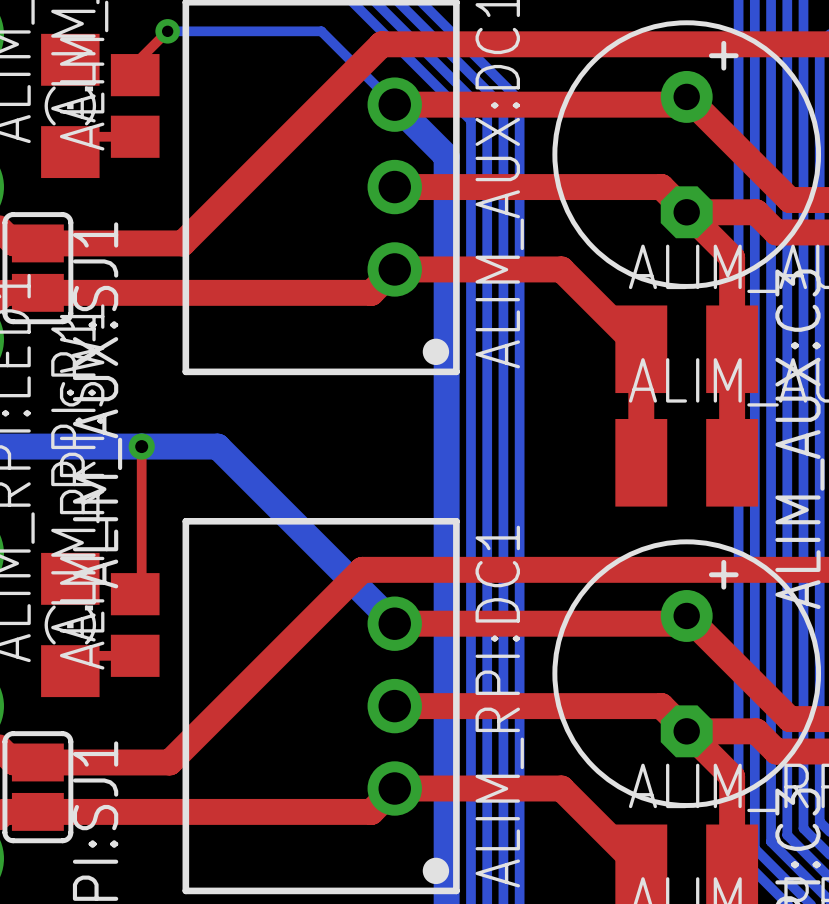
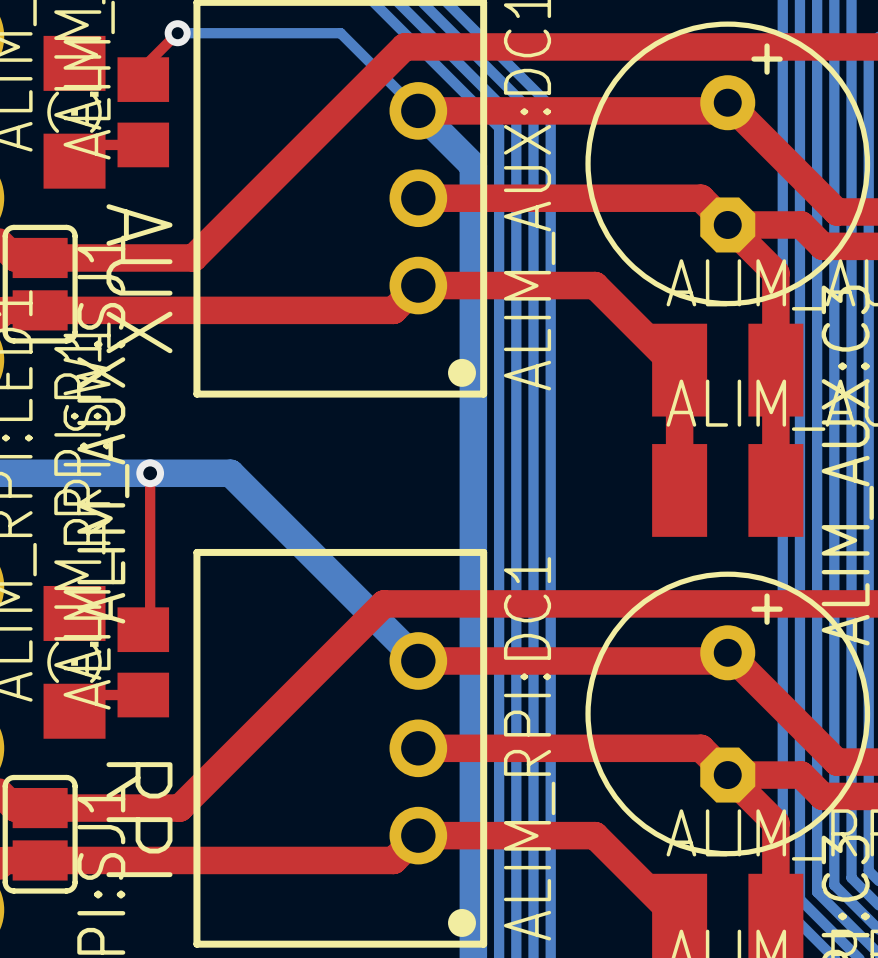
text: none -> AUX (139, 278)
text: none -> RPI (139, 819)

